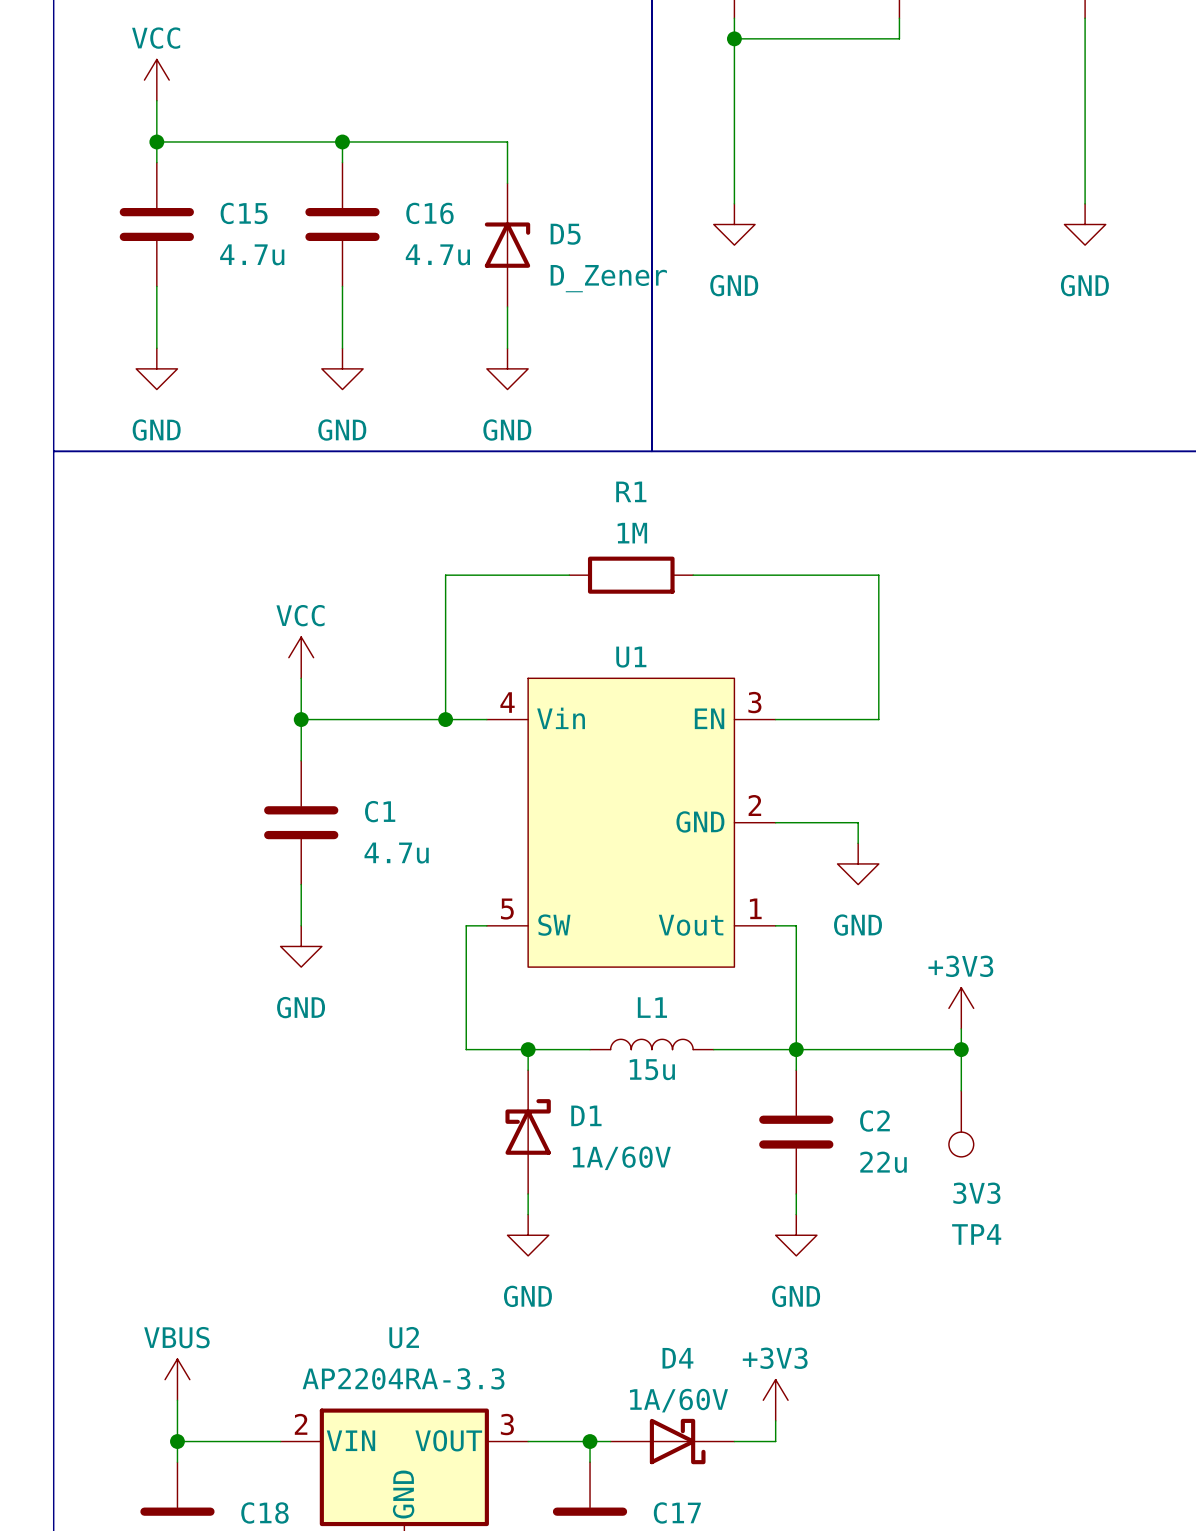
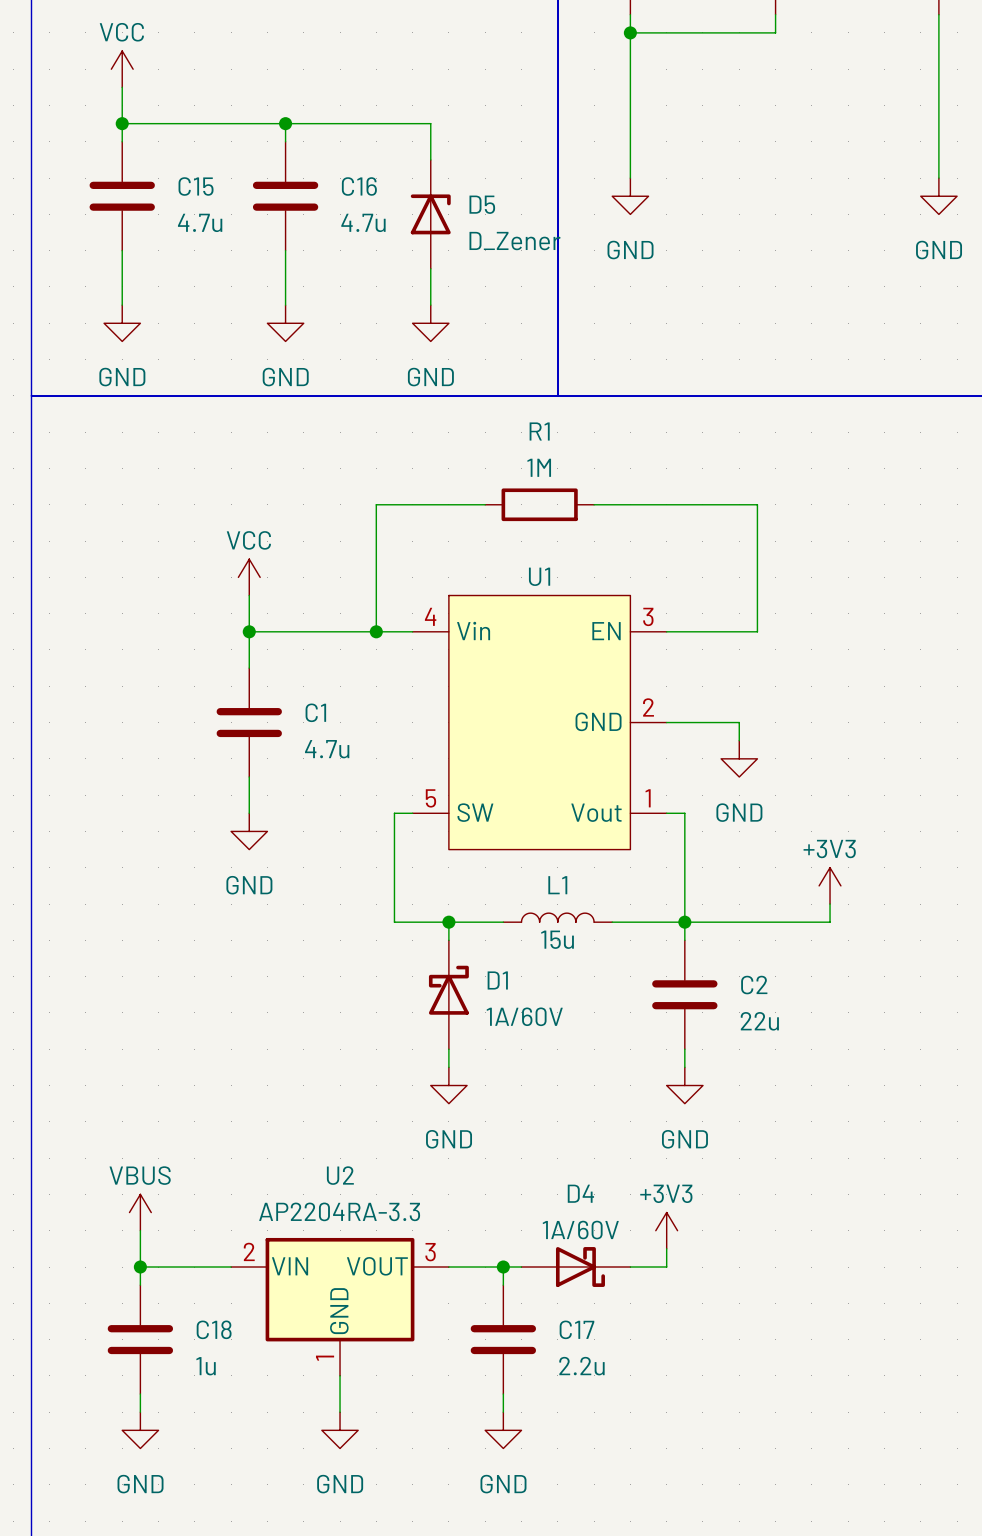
wire: (961, 1049) (961, 1090) -> none
junction: (961, 1049) -> none
TP4: 3V3 (961, 1123) -> none

